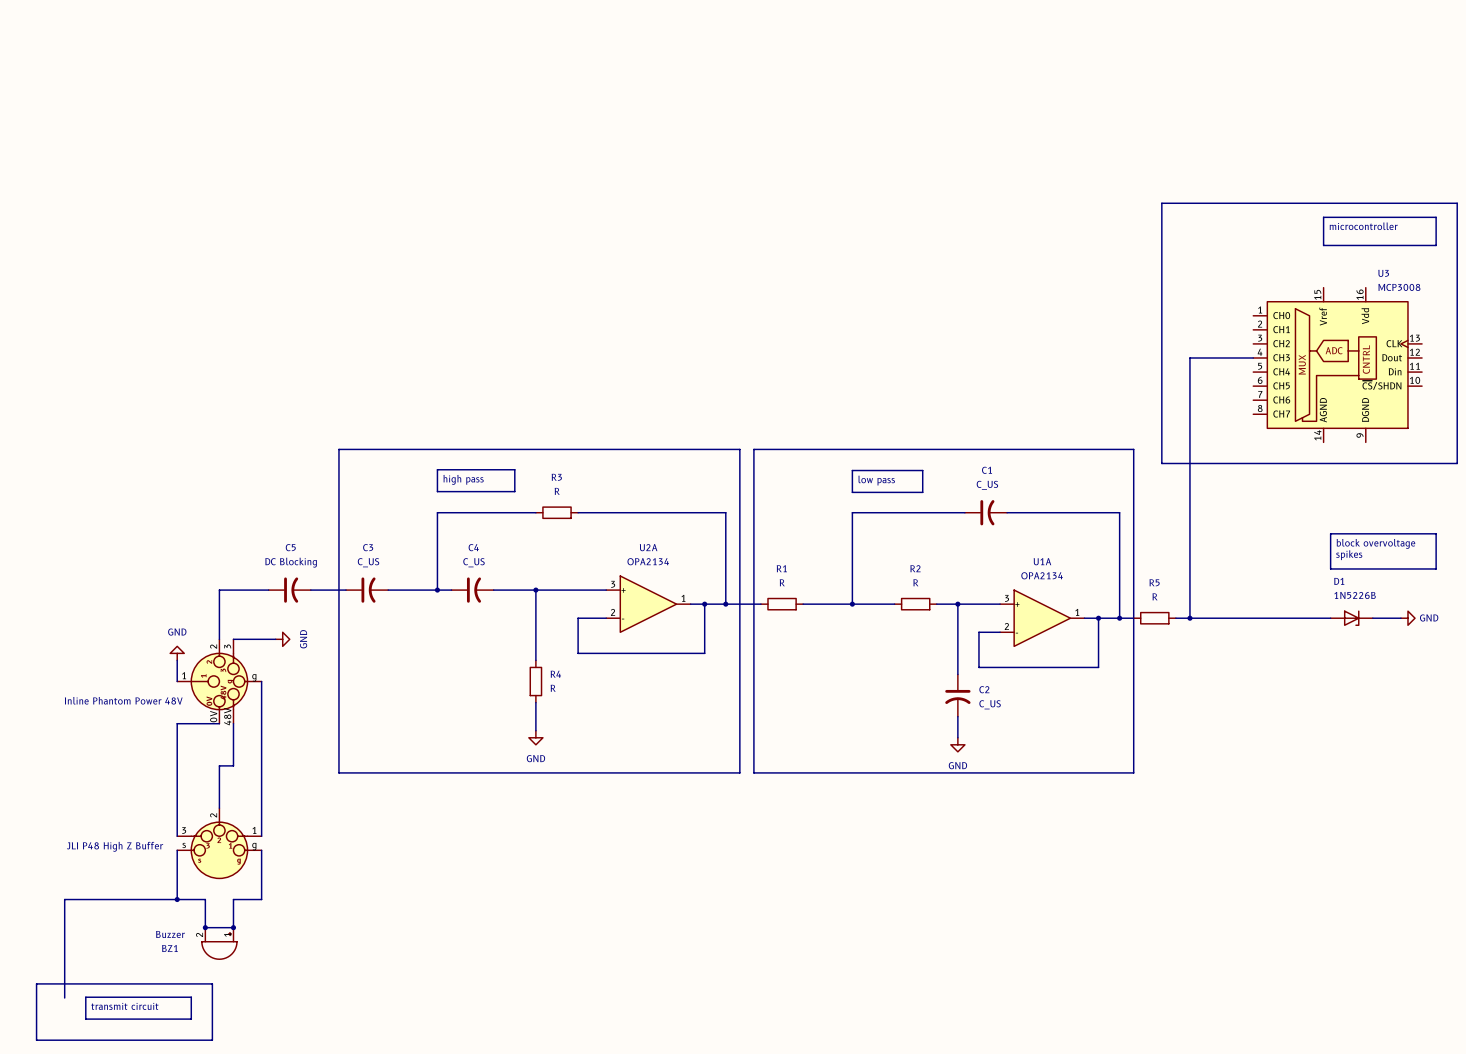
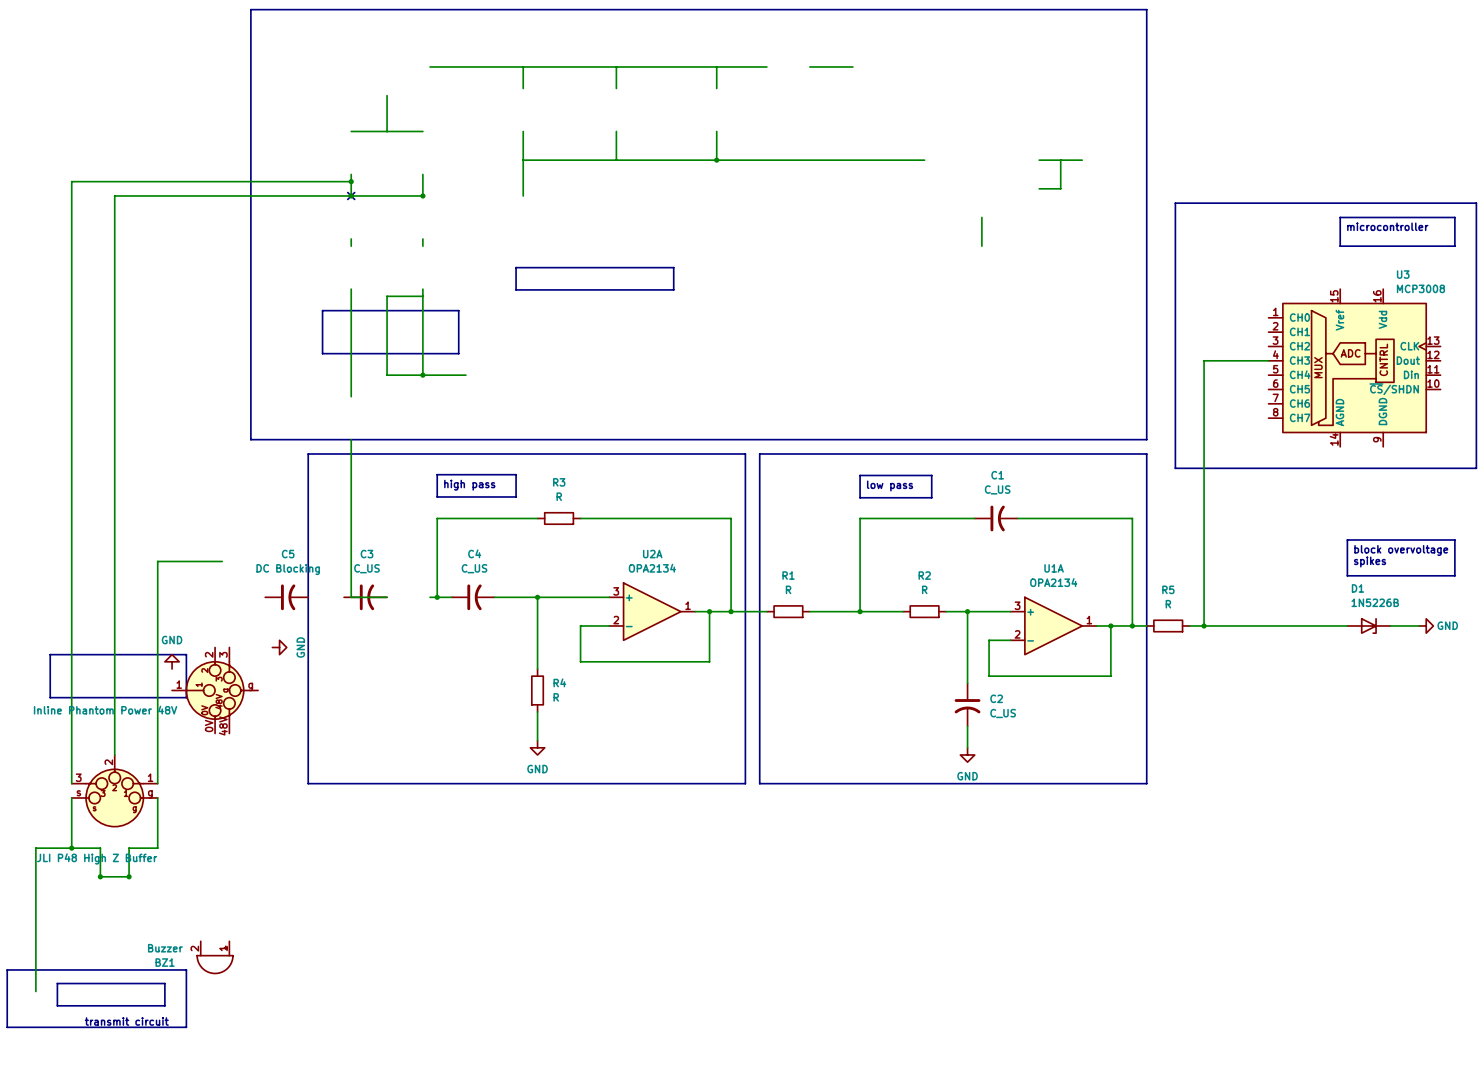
line: none -> (250, 9) (1146, 9) (1146, 439) (250, 439) (250, 9)
wire: none -> (430, 66) (766, 66)
wire: none -> (523, 66) (523, 88)
wire: none -> (616, 66) (616, 88)
wire: none -> (716, 66) (716, 88)
wire: none -> (809, 66) (852, 66)
wire: none -> (387, 95) (387, 131)
wire: none -> (351, 131) (422, 131)
wire: none -> (523, 131) (523, 195)
wire: none -> (616, 131) (616, 160)
wire: none -> (716, 131) (716, 160)
wire: none -> (523, 160) (924, 160)
junction: none -> (716, 160)
wire: none -> (1039, 160) (1082, 160)
wire: none -> (1060, 160) (1060, 188) (1039, 188)
wire: none -> (351, 174) (351, 195)
wire: none -> (422, 174) (422, 195) (114, 195) (114, 754)
wire: none -> (351, 181) (71, 181) (71, 783)
junction: none -> (351, 181)
junction: none -> (351, 195)
no-connect mark: none -> (351, 195)
junction: none -> (422, 195)
wire: none -> (981, 217) (981, 246)
wire: none -> (351, 238) (351, 246)
wire: none -> (422, 238) (422, 246)
line: none -> (516, 267) (673, 267) (673, 289) (516, 289) (516, 267)
wire: none -> (351, 289) (351, 396)
wire: none -> (422, 289) (422, 375)
wire: none -> (422, 296) (387, 296) (387, 375) (465, 375)
line: none -> (322, 310) (458, 310) (458, 353) (322, 353) (322, 310)
junction: none -> (422, 375)
line: (338, 449) (338, 772) -> (336, 453) (308, 453) (308, 783) (336, 783)
wire: none -> (222, 561) (157, 561) (157, 783)
wire: (268, 590) (219, 590) (219, 639) -> none
wire: (310, 590) (346, 590) -> none
wire: (388, 590) (430, 590) -> (387, 597) (351, 597) (351, 439)
wire: (233, 639) (275, 639) -> none
line: none -> (50, 654) (186, 654) (186, 697) (50, 697) (50, 654)
wire: (177, 660) (177, 681) -> none
wire: (261, 681) (261, 836) -> none
wire: (219, 723) (177, 723) (177, 836) -> none
wire: (233, 723) (233, 765) (219, 765) (219, 808) -> none
wire: none -> (157, 797) (157, 848) (129, 848) (129, 876) (100, 876) (100, 848) (35, 848) (35, 991)
junction: none -> (71, 848)
part position: (219, 843) -> (114, 790)
wire: (177, 850) (177, 899) -> (71, 797) (71, 848)
wire: (261, 850) (261, 899) (233, 899) (233, 927) (205, 927) (205, 899) (64, 899) (64, 997) -> none
junction: none -> (100, 876)
junction: none -> (129, 876)
junction: (177, 899) -> none
junction: (205, 927) -> none
junction: (233, 927) -> none
line: none -> (57, 983) (164, 983) (164, 1005) (57, 1005) (57, 983)
line: (36, 983) (212, 983) (212, 1040) (36, 1040) (36, 983) -> none
line: (191, 997) (85, 997) (85, 1019) (191, 1019) (191, 1012) -> (186, 1012) (186, 969) (7, 969) (7, 1027) (186, 1027)

